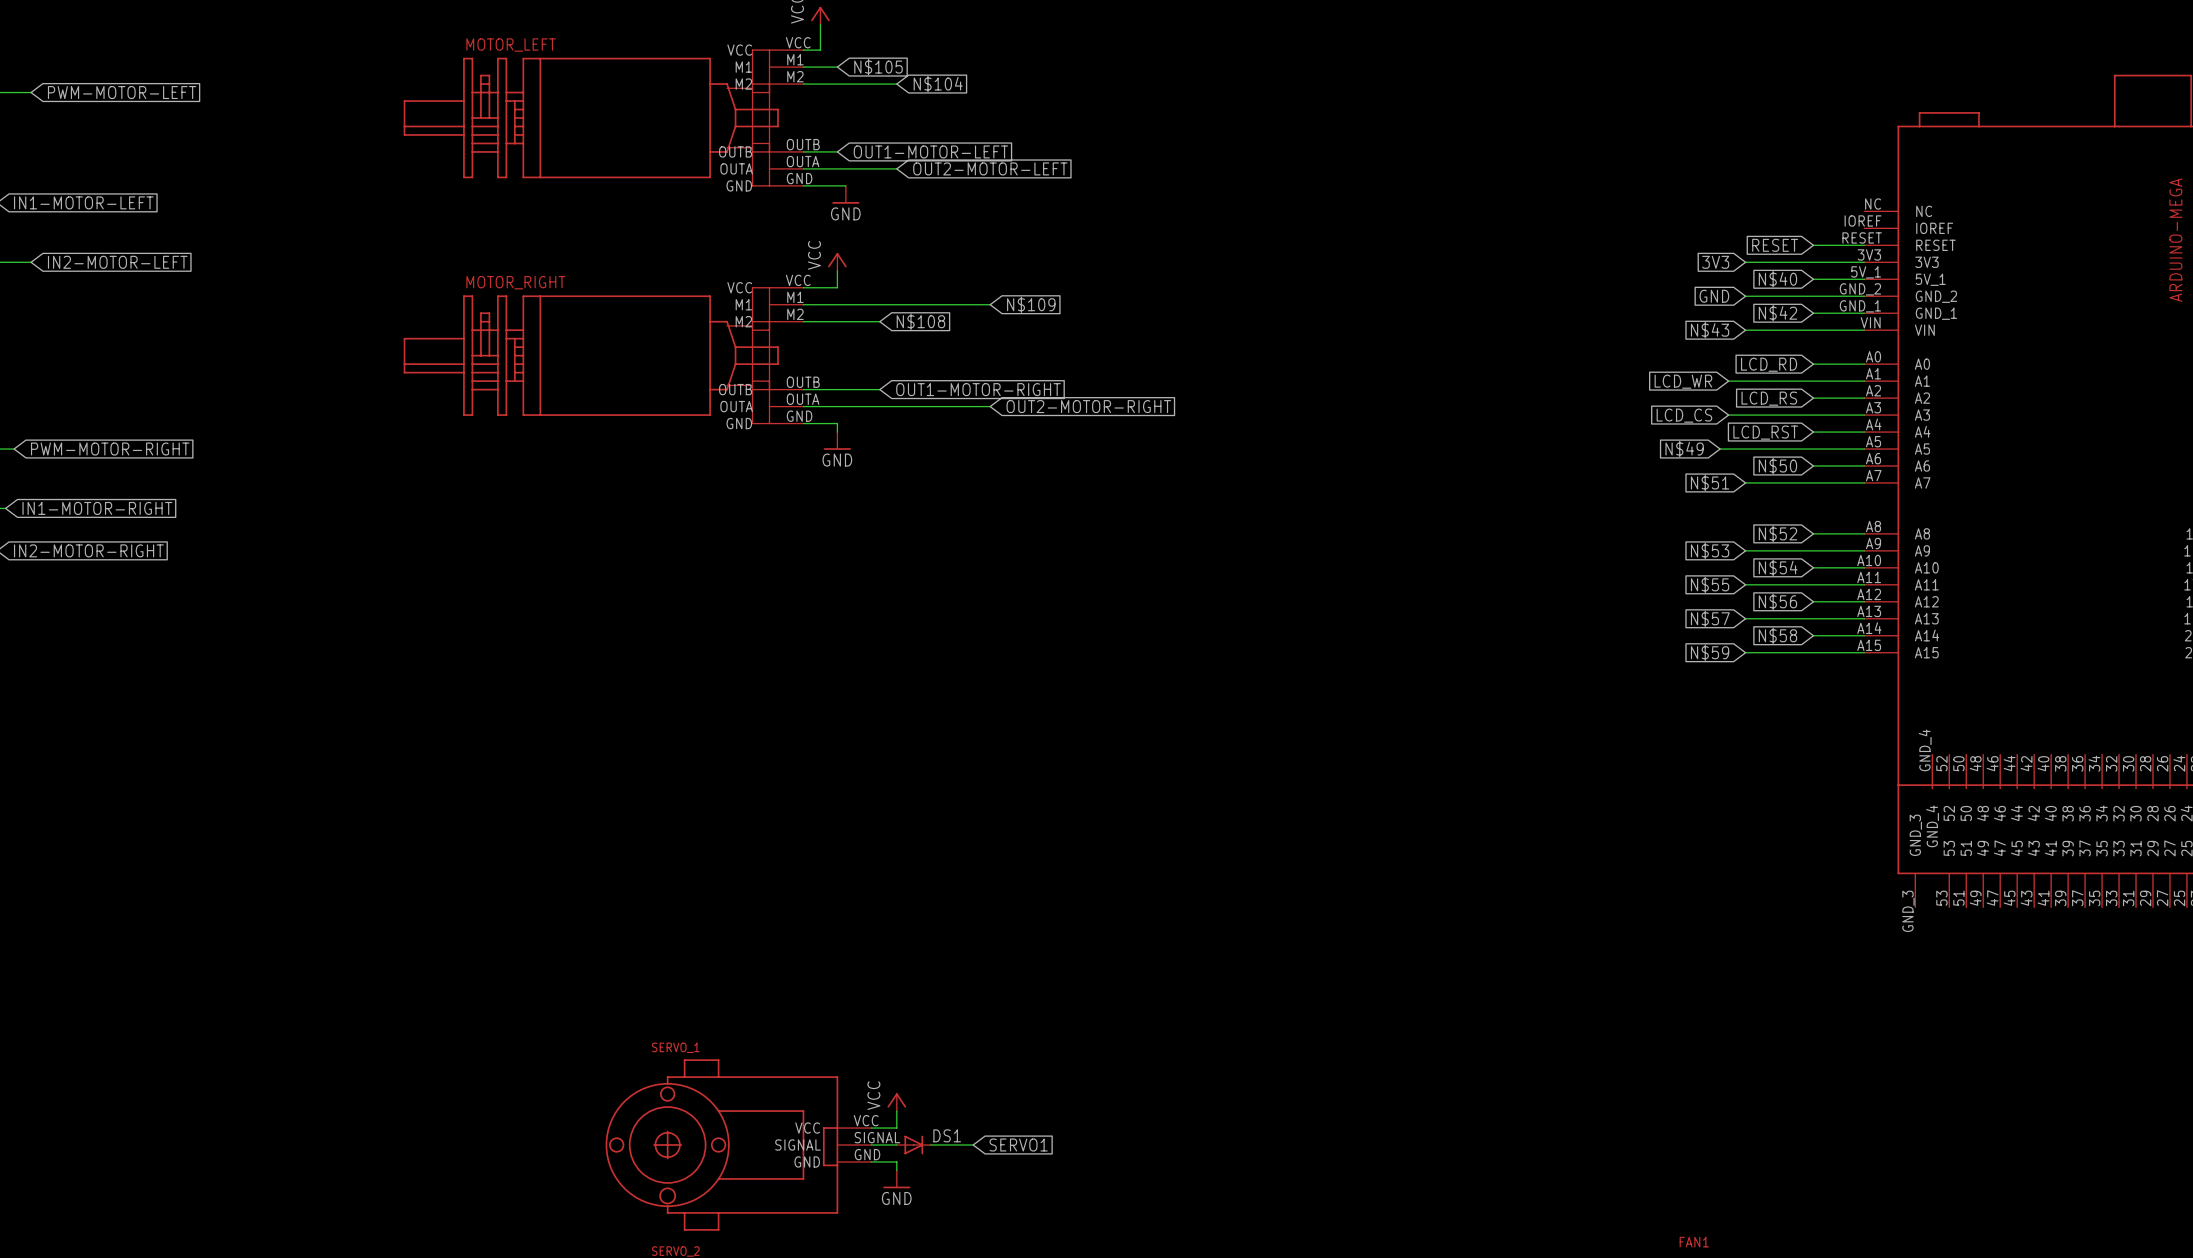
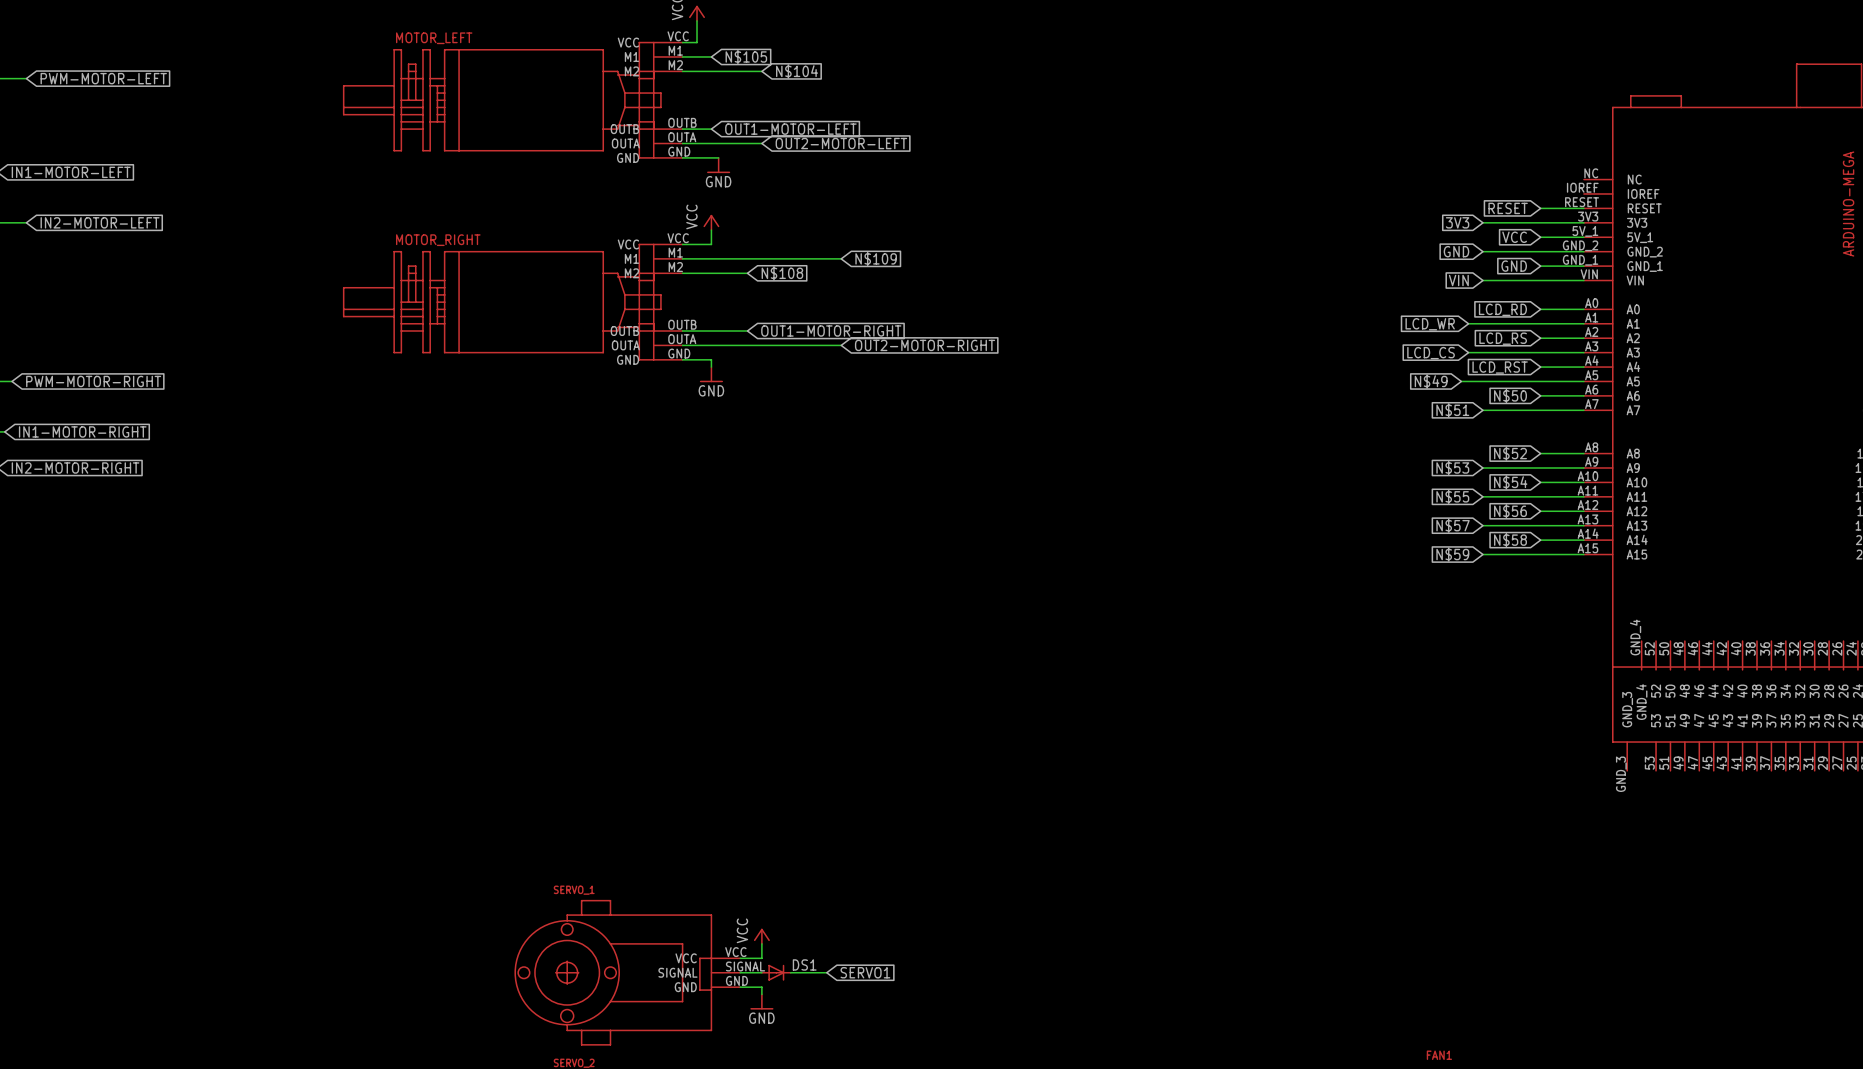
global label: N$40 (1777, 279) -> VCC (1514, 237)
global label: N$42 (1777, 313) -> GND (1514, 266)
global label: N$43 (1710, 330) -> VIN (1458, 280)

